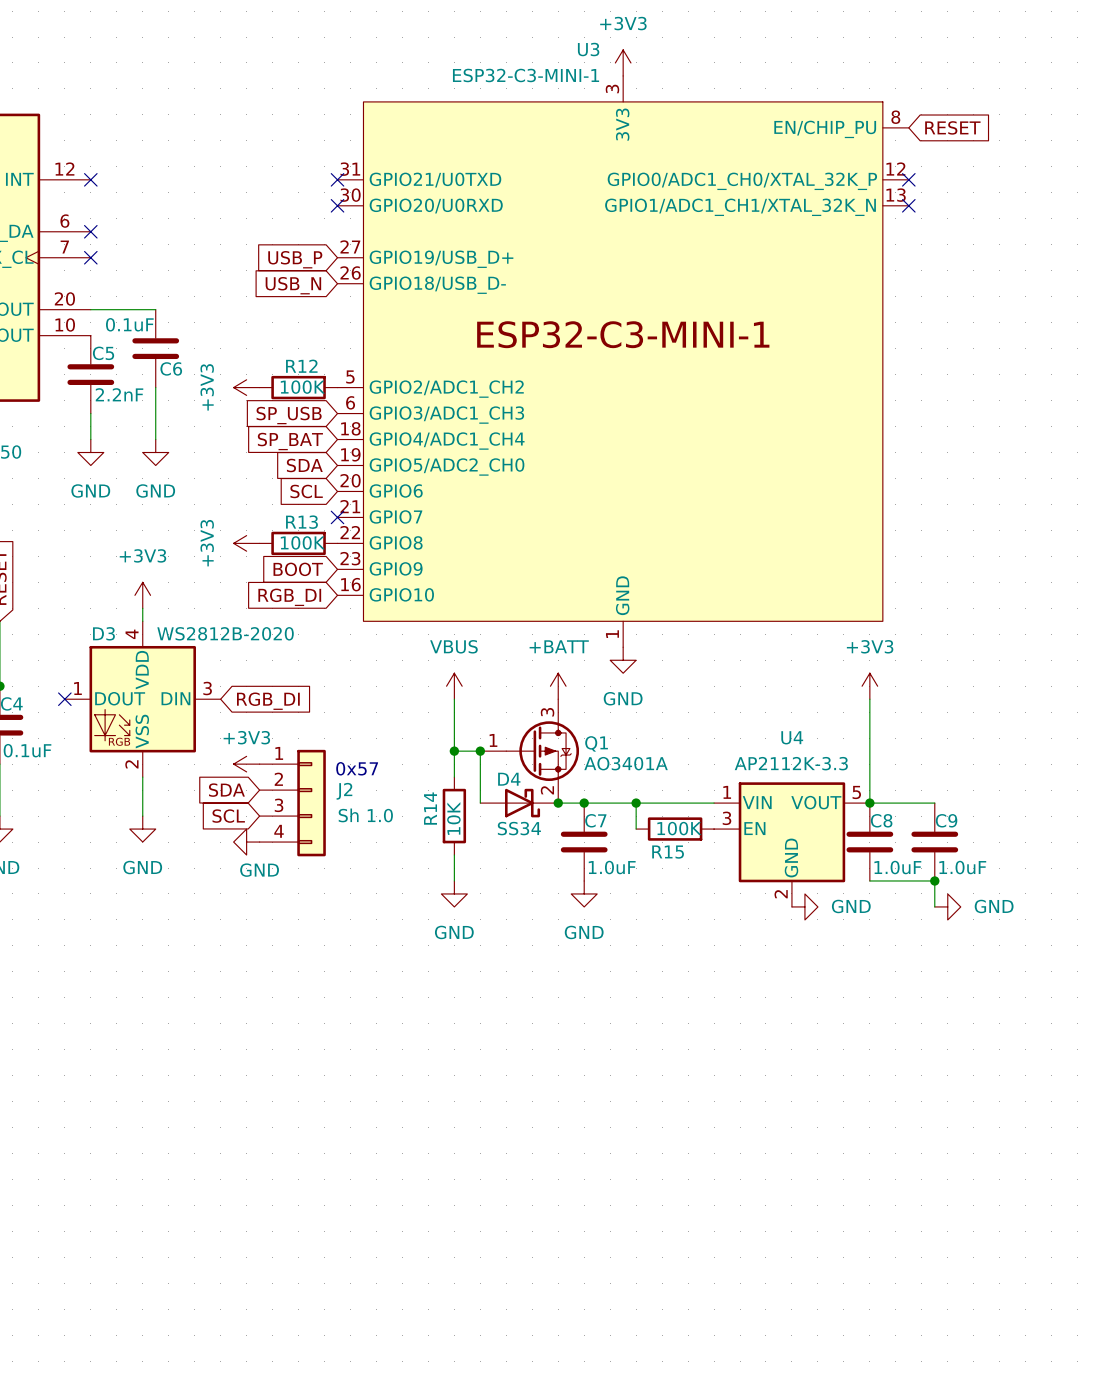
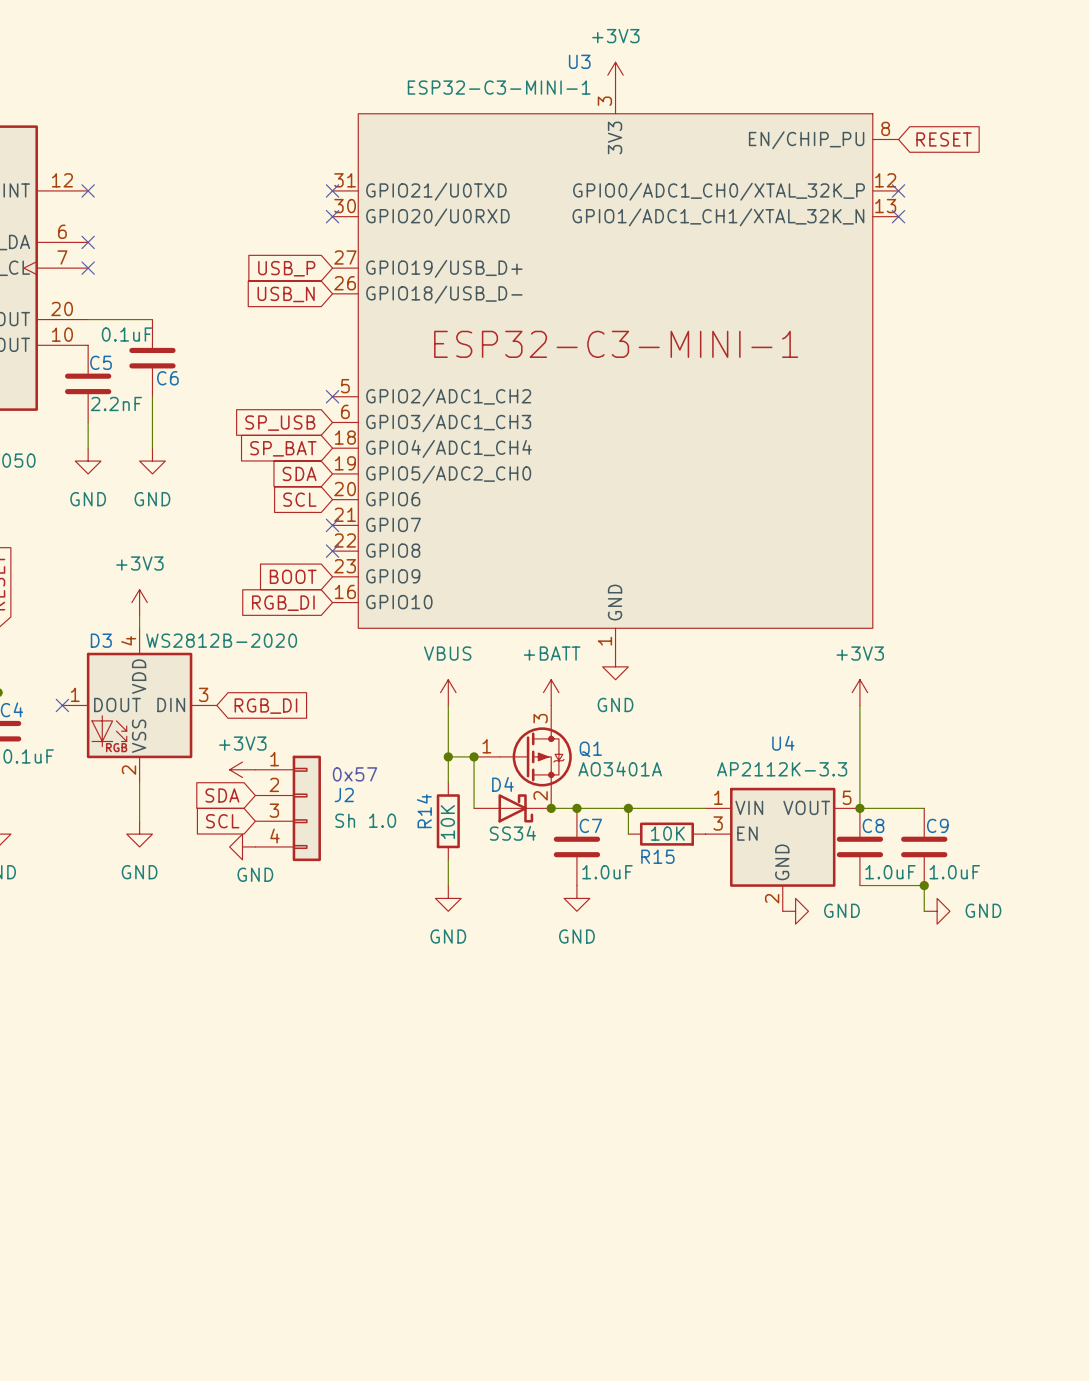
power symbol: +3V3 (246, 387) -> none
R12: 100K (298, 387) -> none
no-connect mark: none -> (332, 396)
power symbol: +3V3 (246, 543) -> none
R13: 100K (298, 543) -> none
no-connect mark: none -> (332, 551)
R15 value: 100K (679, 828) -> 10K (667, 833)

